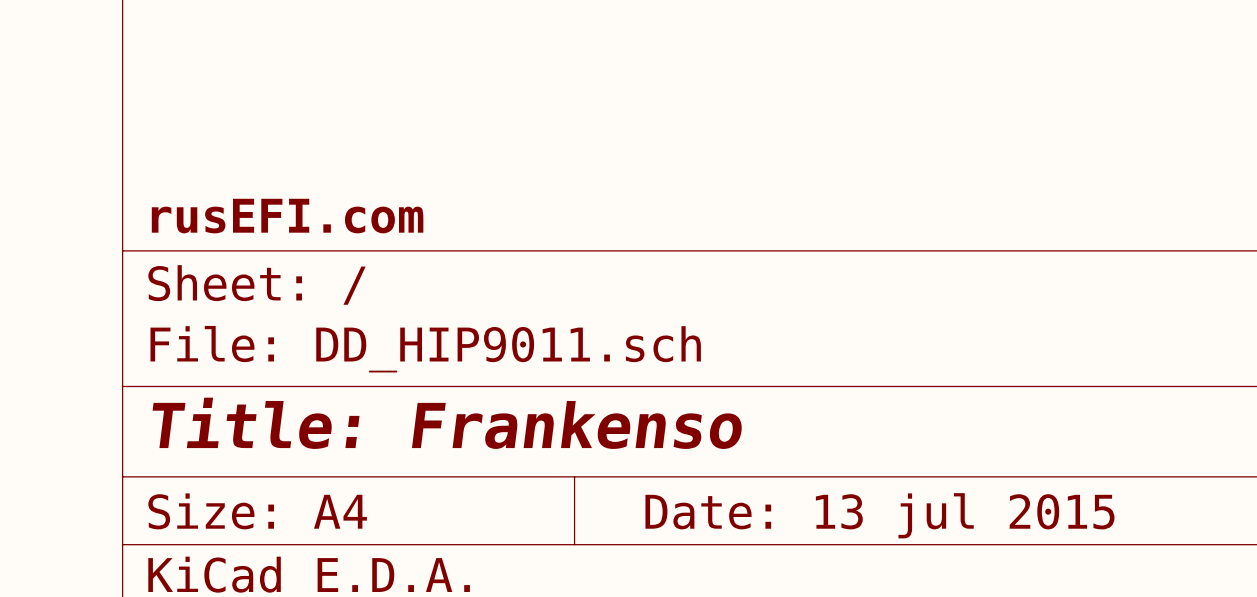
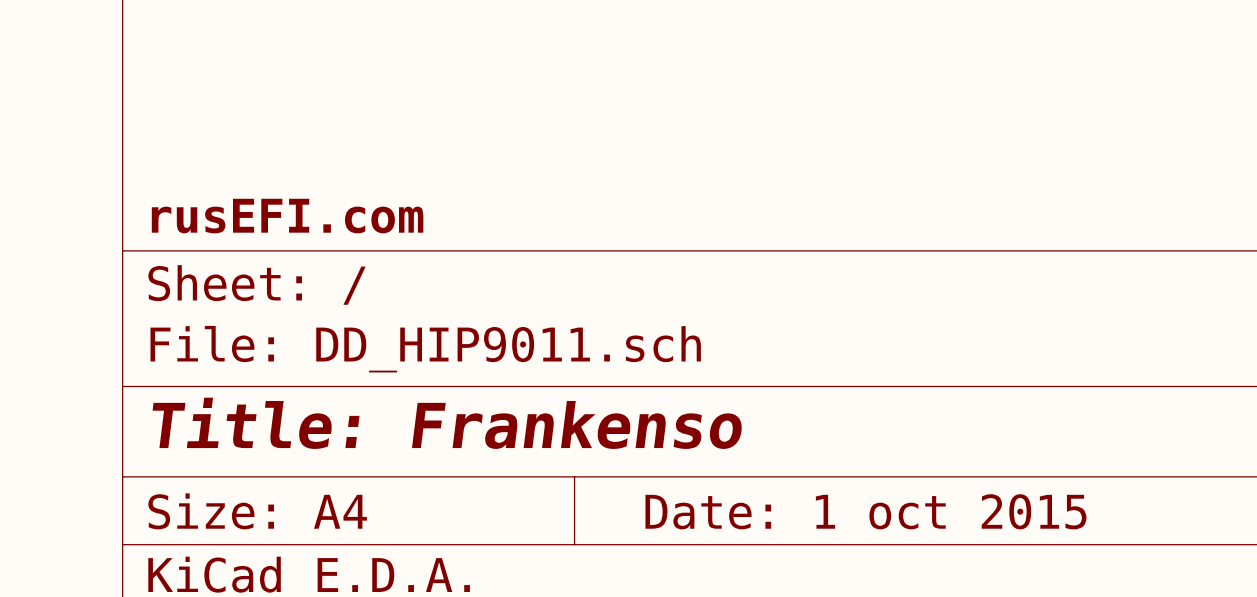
title block: Date: 13 jul 2015 (879, 515) -> Date: 1 oct 2015 (865, 511)

